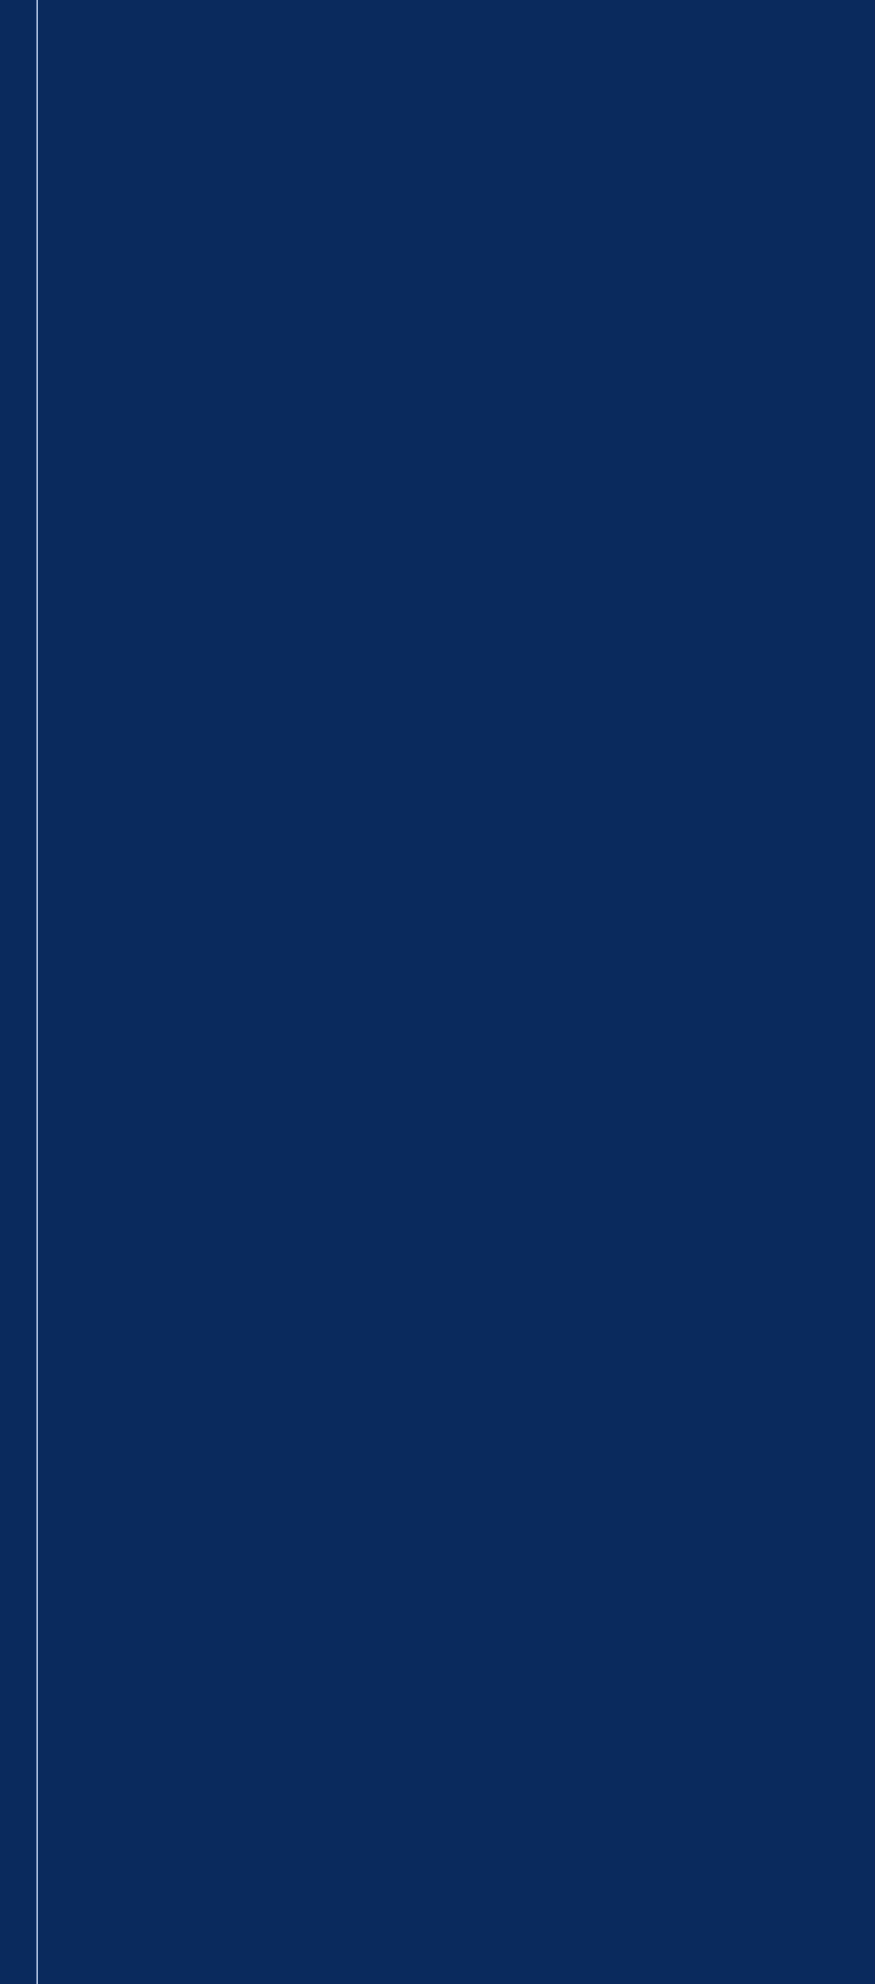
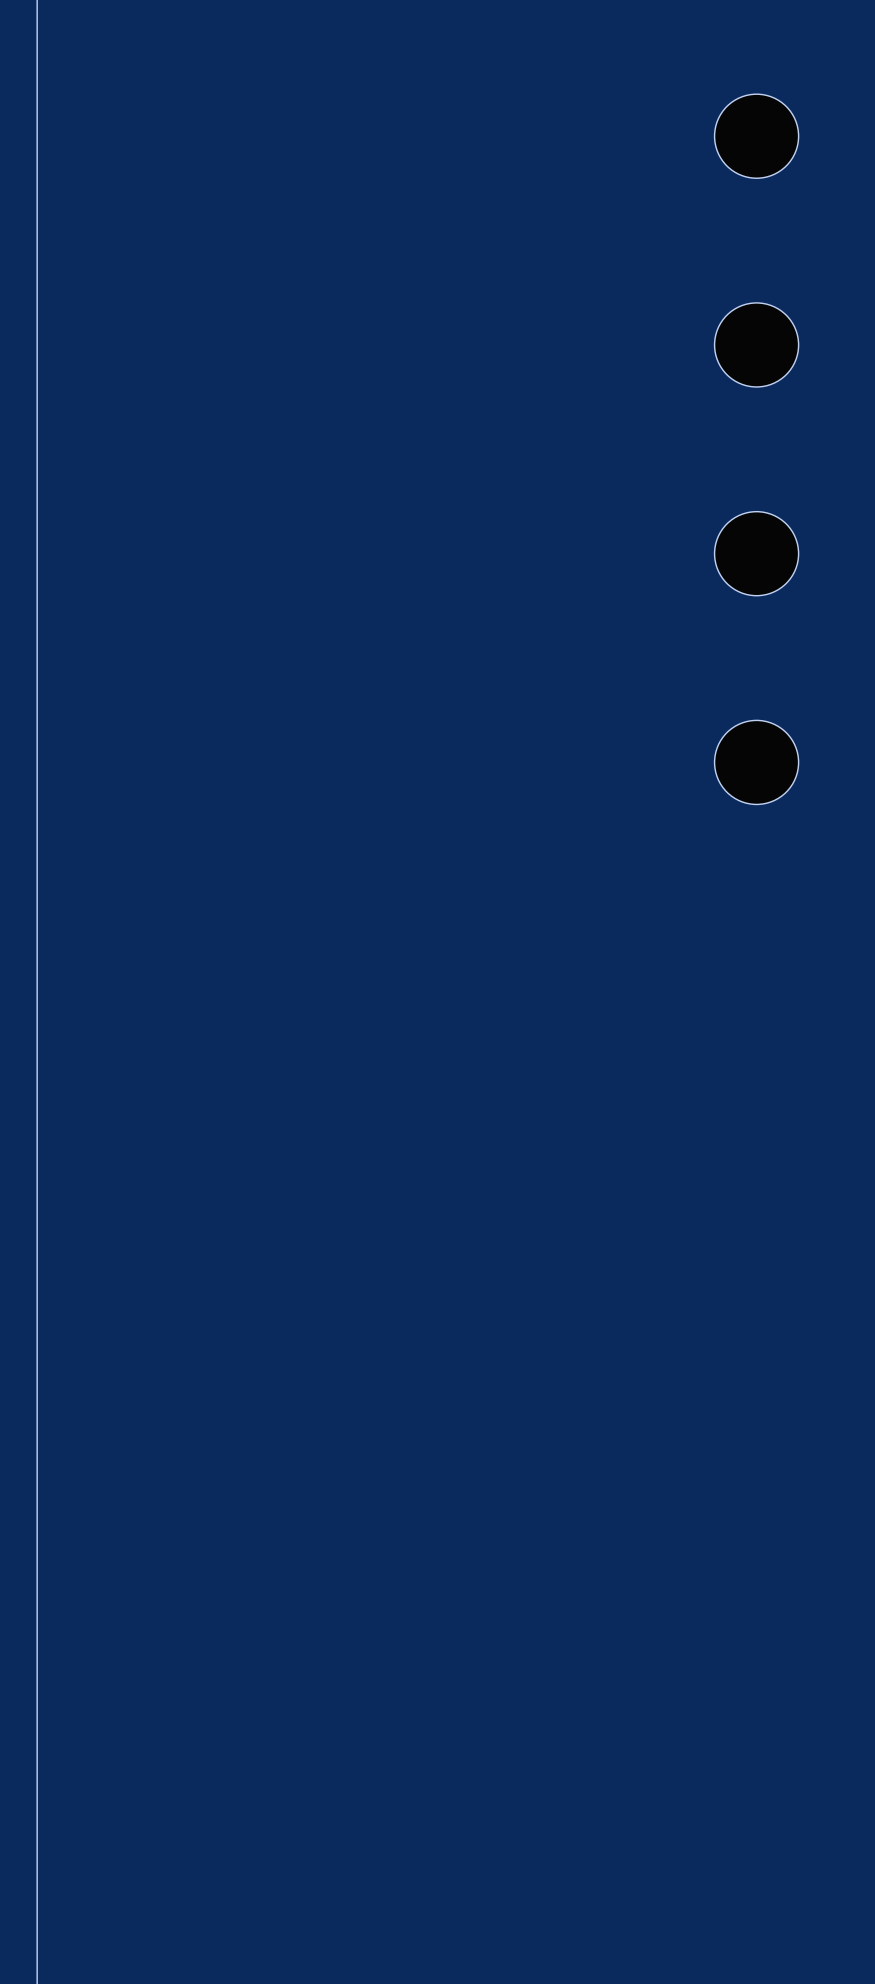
part: none -> (756, 136)
part: none -> (756, 344)
part: none -> (756, 553)
part: none -> (756, 762)

